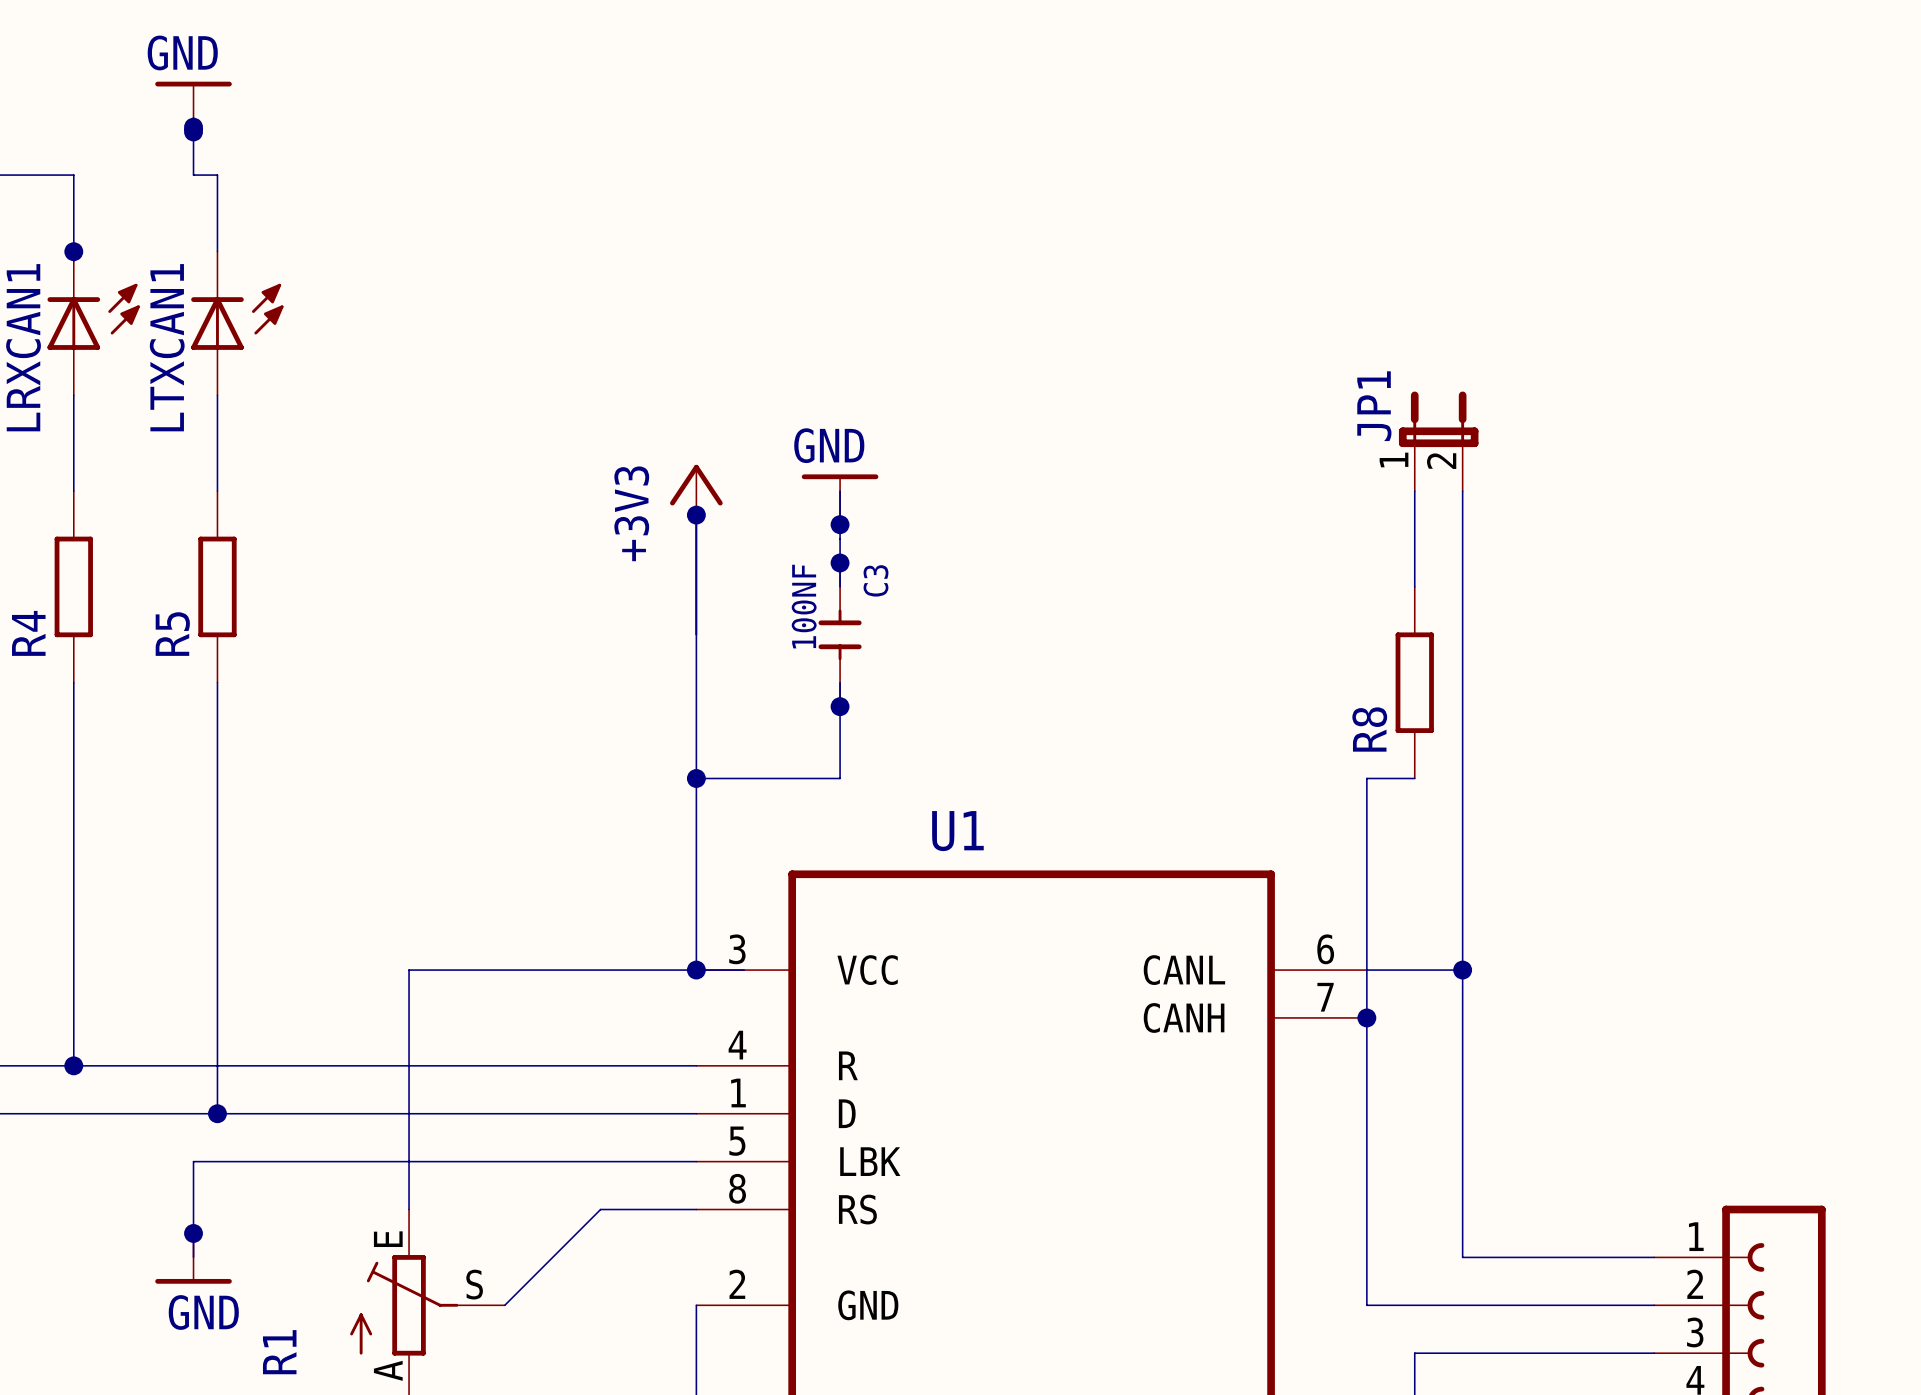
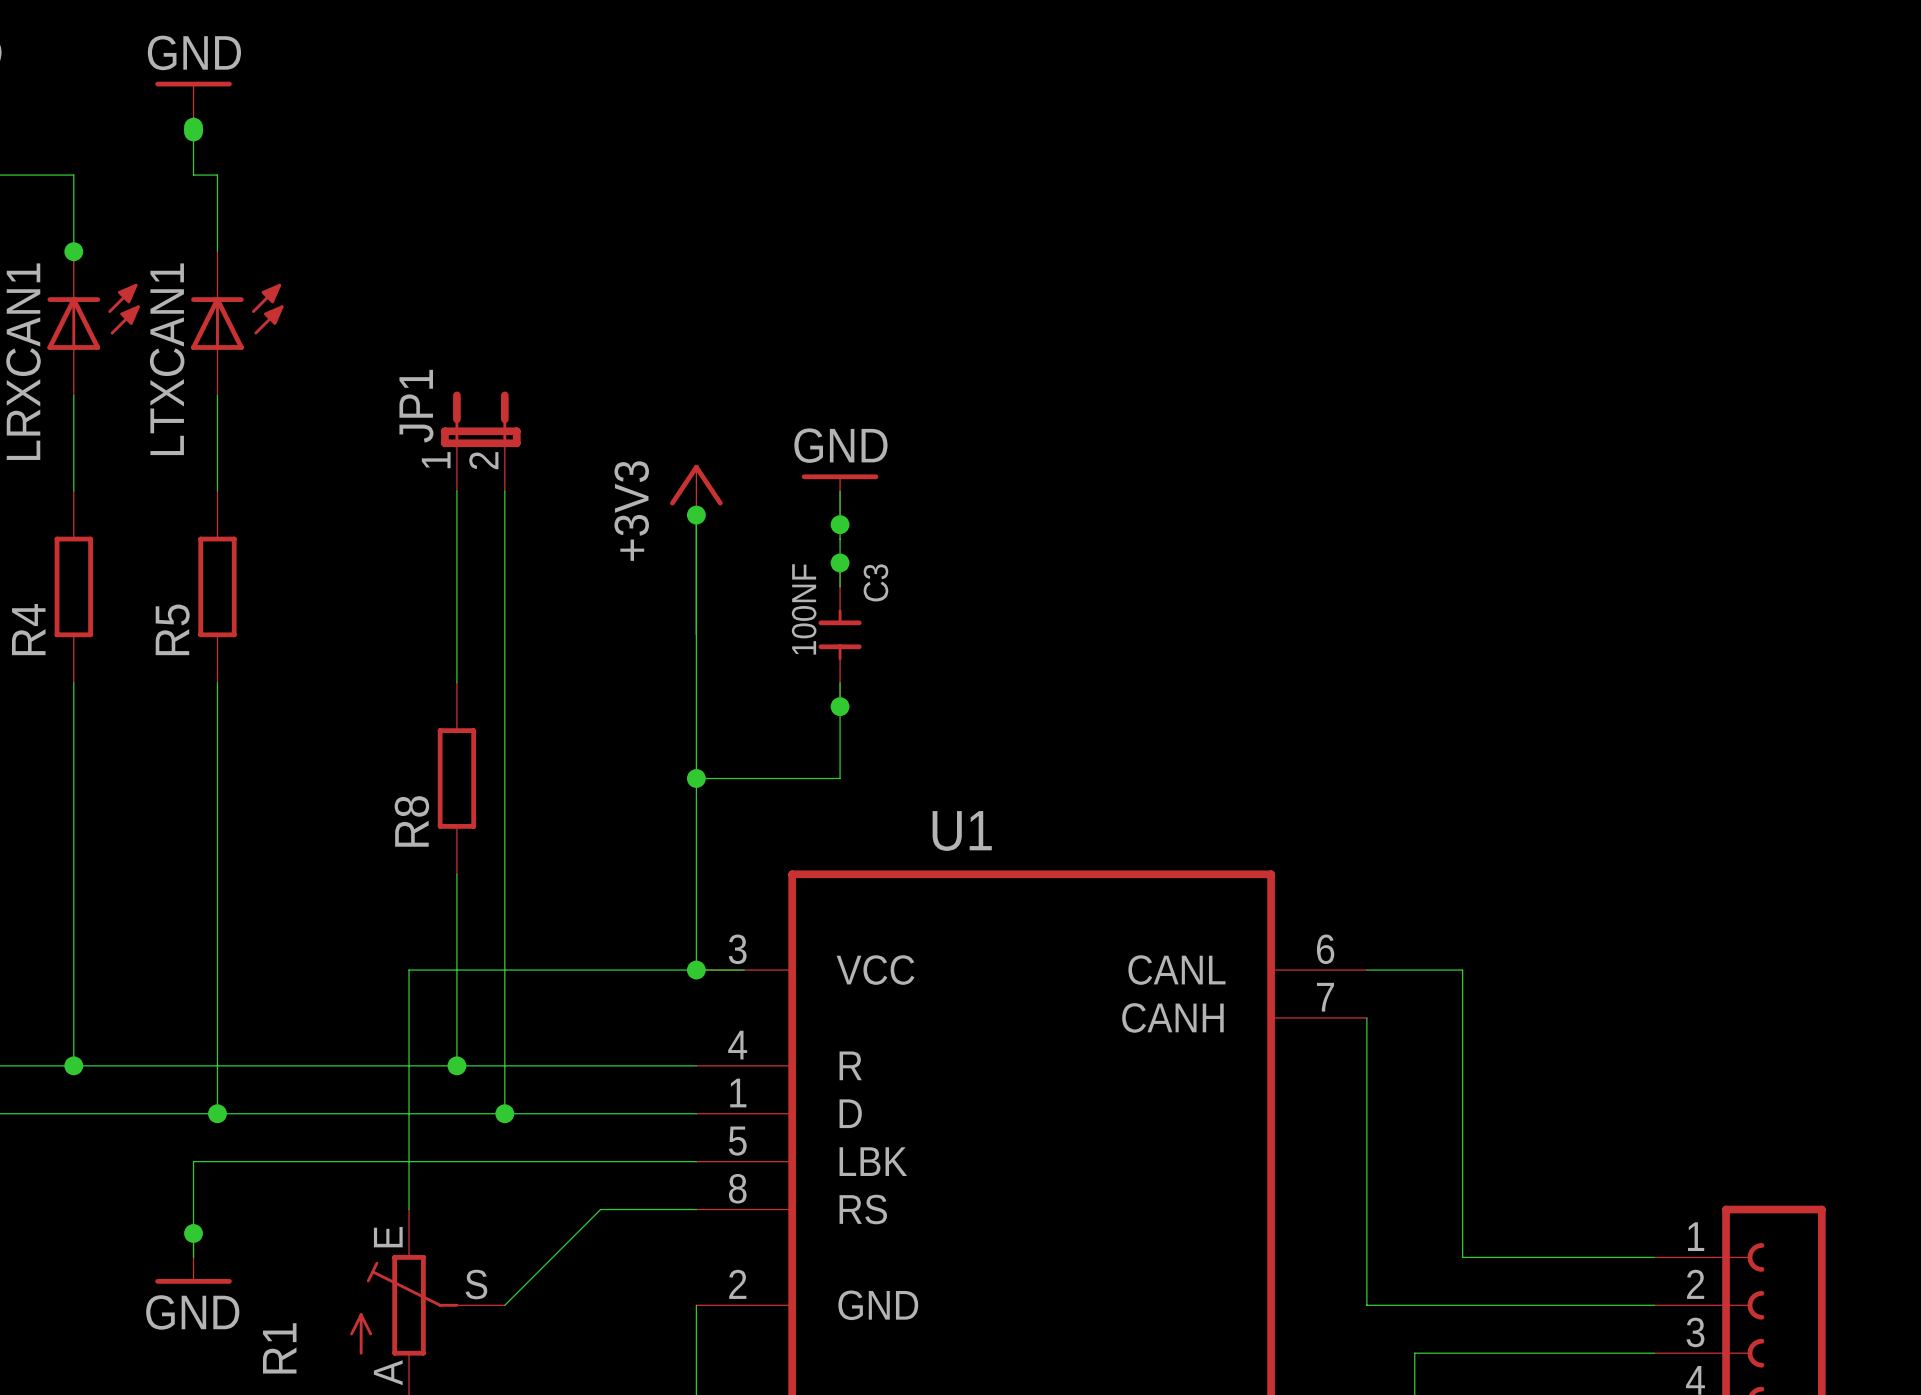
JP1 position: (1438, 441) -> (480, 441)
wire: none -> (456, 491) (456, 682)
wire: none -> (504, 491) (504, 1113)
wire: (1414, 491) (1414, 586) -> none
wire: (1462, 491) (1462, 970) -> none
R8 position: (1414, 682) -> (456, 778)
wire: (1414, 778) (1366, 778) (1366, 1017) -> none
wire: none -> (456, 874) (456, 1065)
junction: (1462, 970) -> none
junction: (1366, 1017) -> none
junction: none -> (456, 1065)
junction: none -> (504, 1113)

